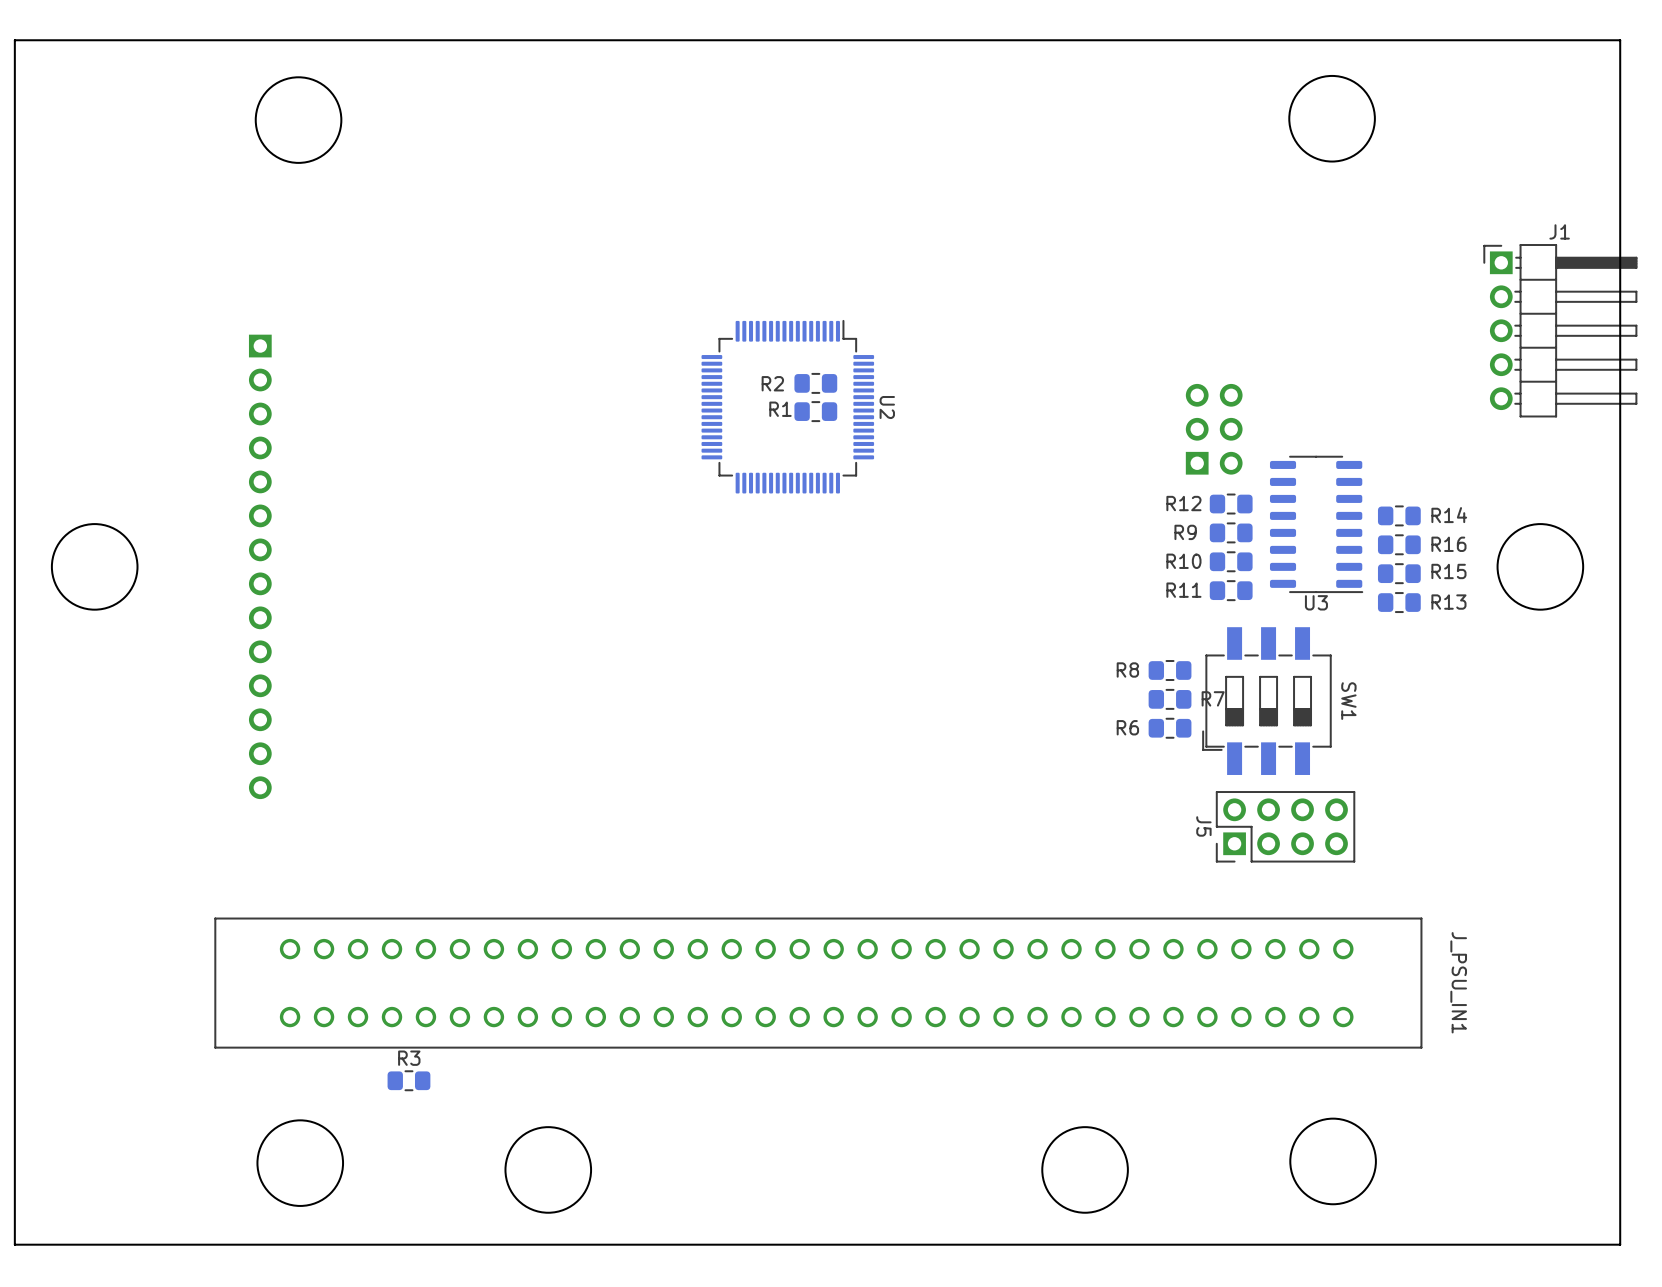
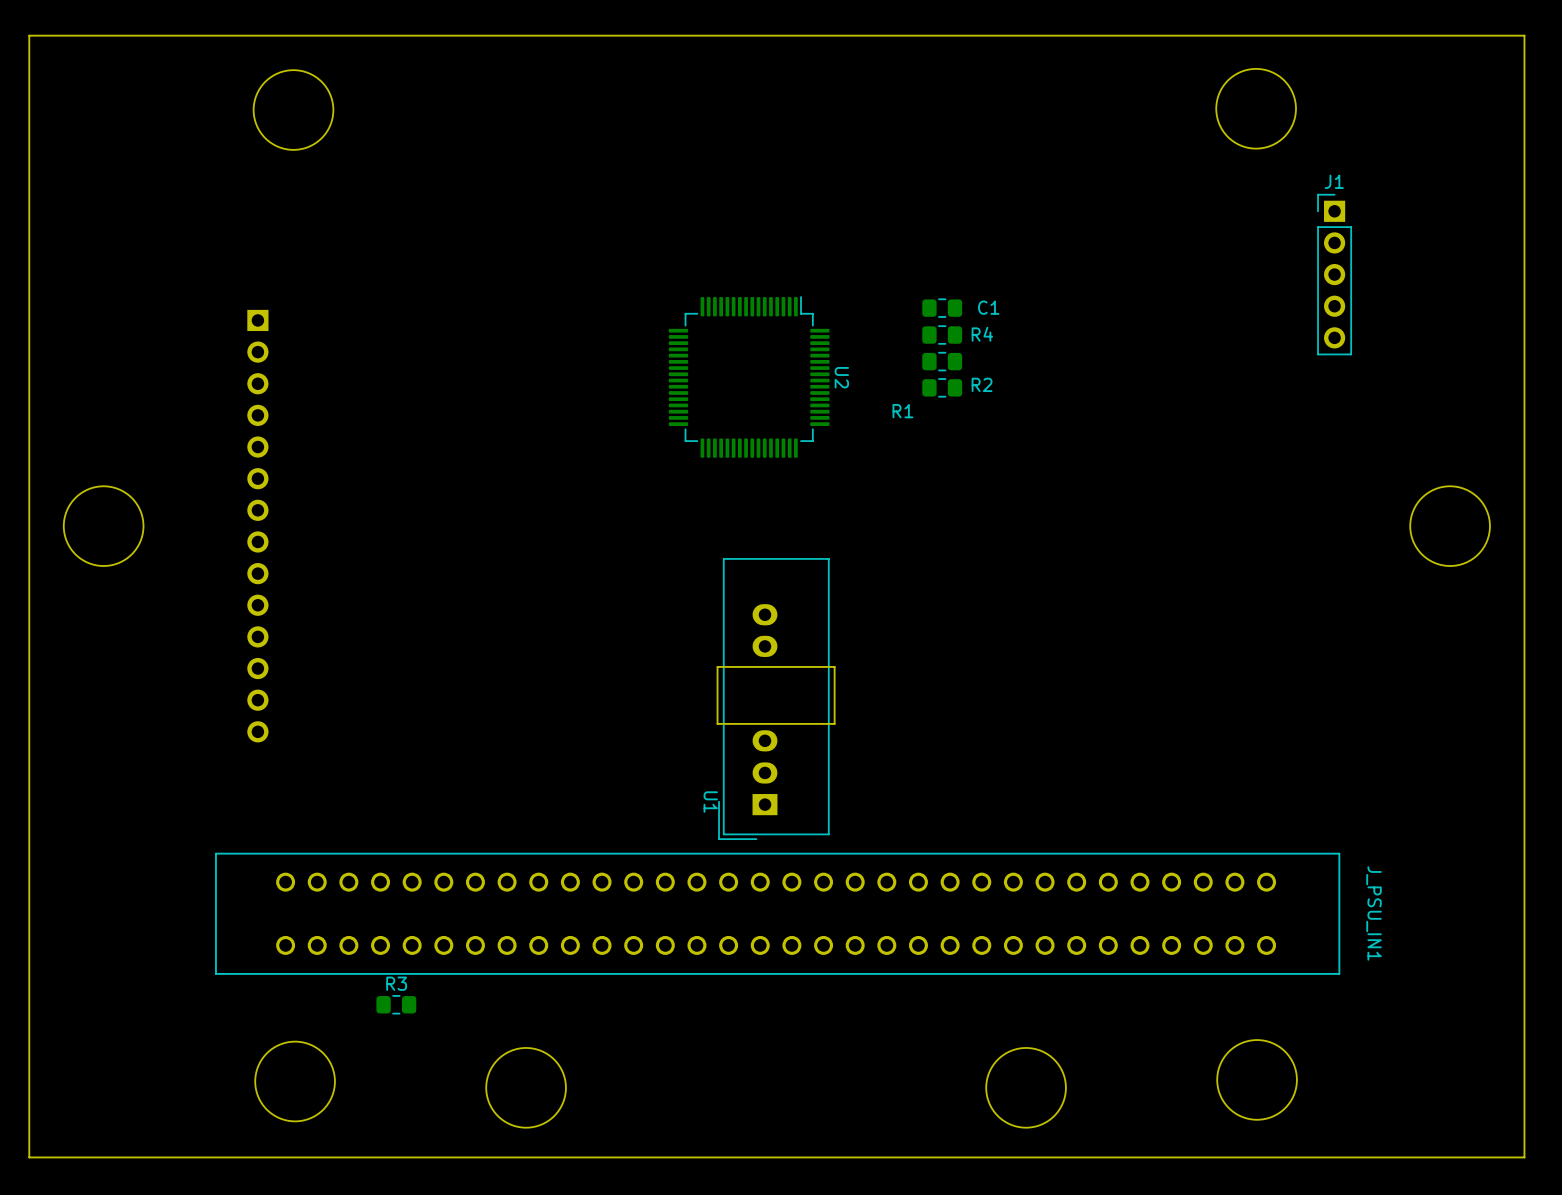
J1 footprint: [1483, 244, 1638, 418] -> [1317, 193, 1352, 356]
C1: none -> (942, 308)
R4: none -> (942, 335)
R2 name position: R2 (772, 383) -> R2 (982, 384)
R2 position: (815, 383) -> (942, 361)
R1 name position: R1 (780, 409) -> R1 (902, 411)
R1 position: (815, 411) -> (942, 387)
part: (1214, 429) -> none
R12: (1231, 504) -> none
R14: (1399, 515) -> none
U3: (1316, 524) -> none
R9: (1231, 532) -> none
R16: (1399, 544) -> none
R10: (1231, 561) -> none
R15: (1399, 573) -> none
R11: (1231, 590) -> none
R13: (1399, 602) -> none
R8: (1170, 670) -> none
R7: (1170, 699) -> none
SW1: (1266, 701) -> none
board edge: none -> (834, 666) (834, 723) (717, 723) (717, 666) (834, 666)
R6: (1170, 728) -> none
U1: none -> (773, 699)
J5: (1285, 826) -> none

